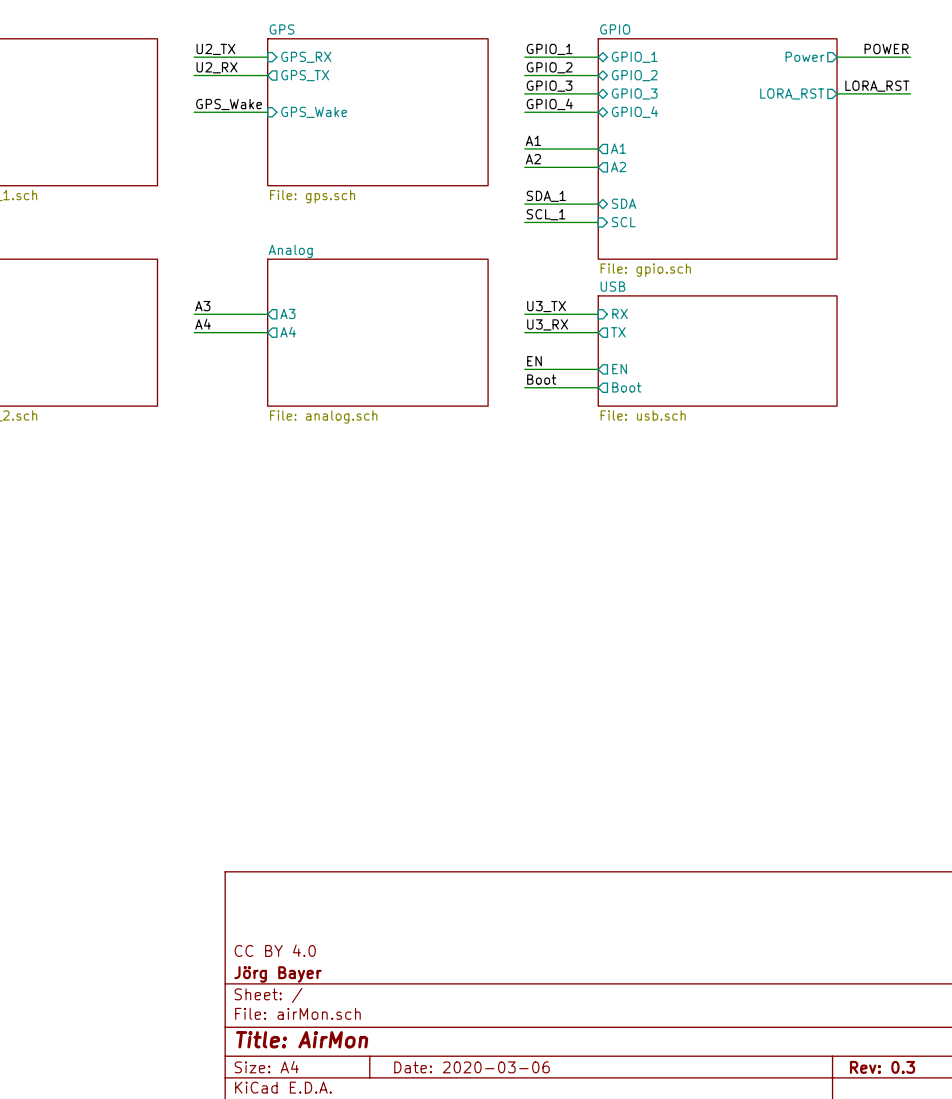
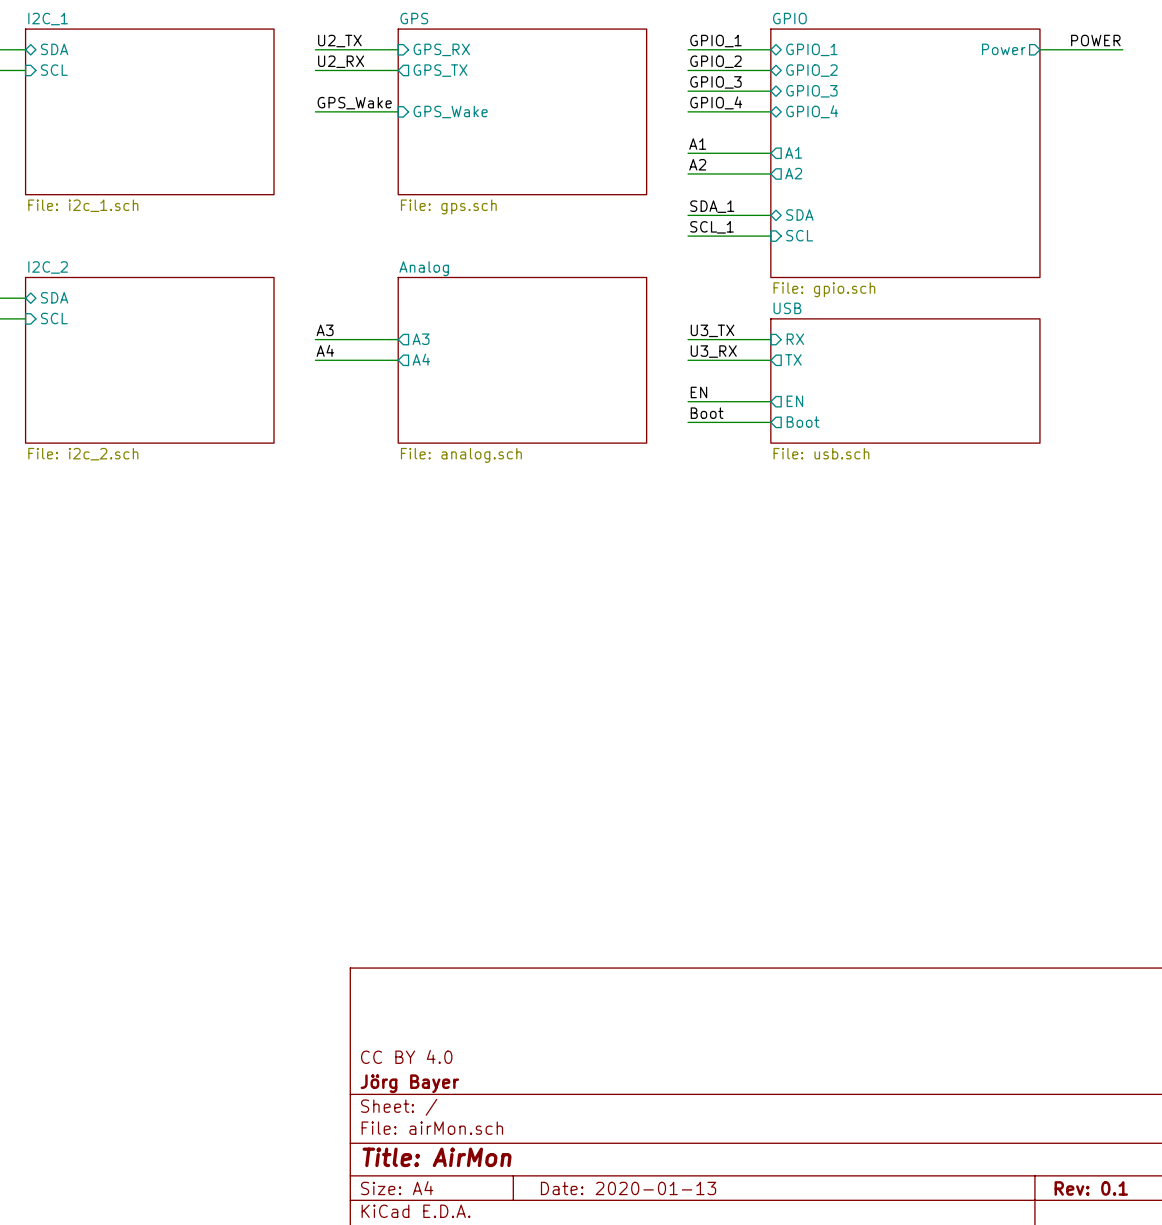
label: LORA_RST (877, 86) -> none
sheet pin: LORA_RST (792, 93) -> none
wire: (837, 93) (910, 93) -> none
title block: Date: 2020-03-06 (472, 1067) -> Date: 2020-01-13 (628, 1188)
title block: Rev: 0.3 (882, 1067) -> Rev: 0.1 (1091, 1188)

